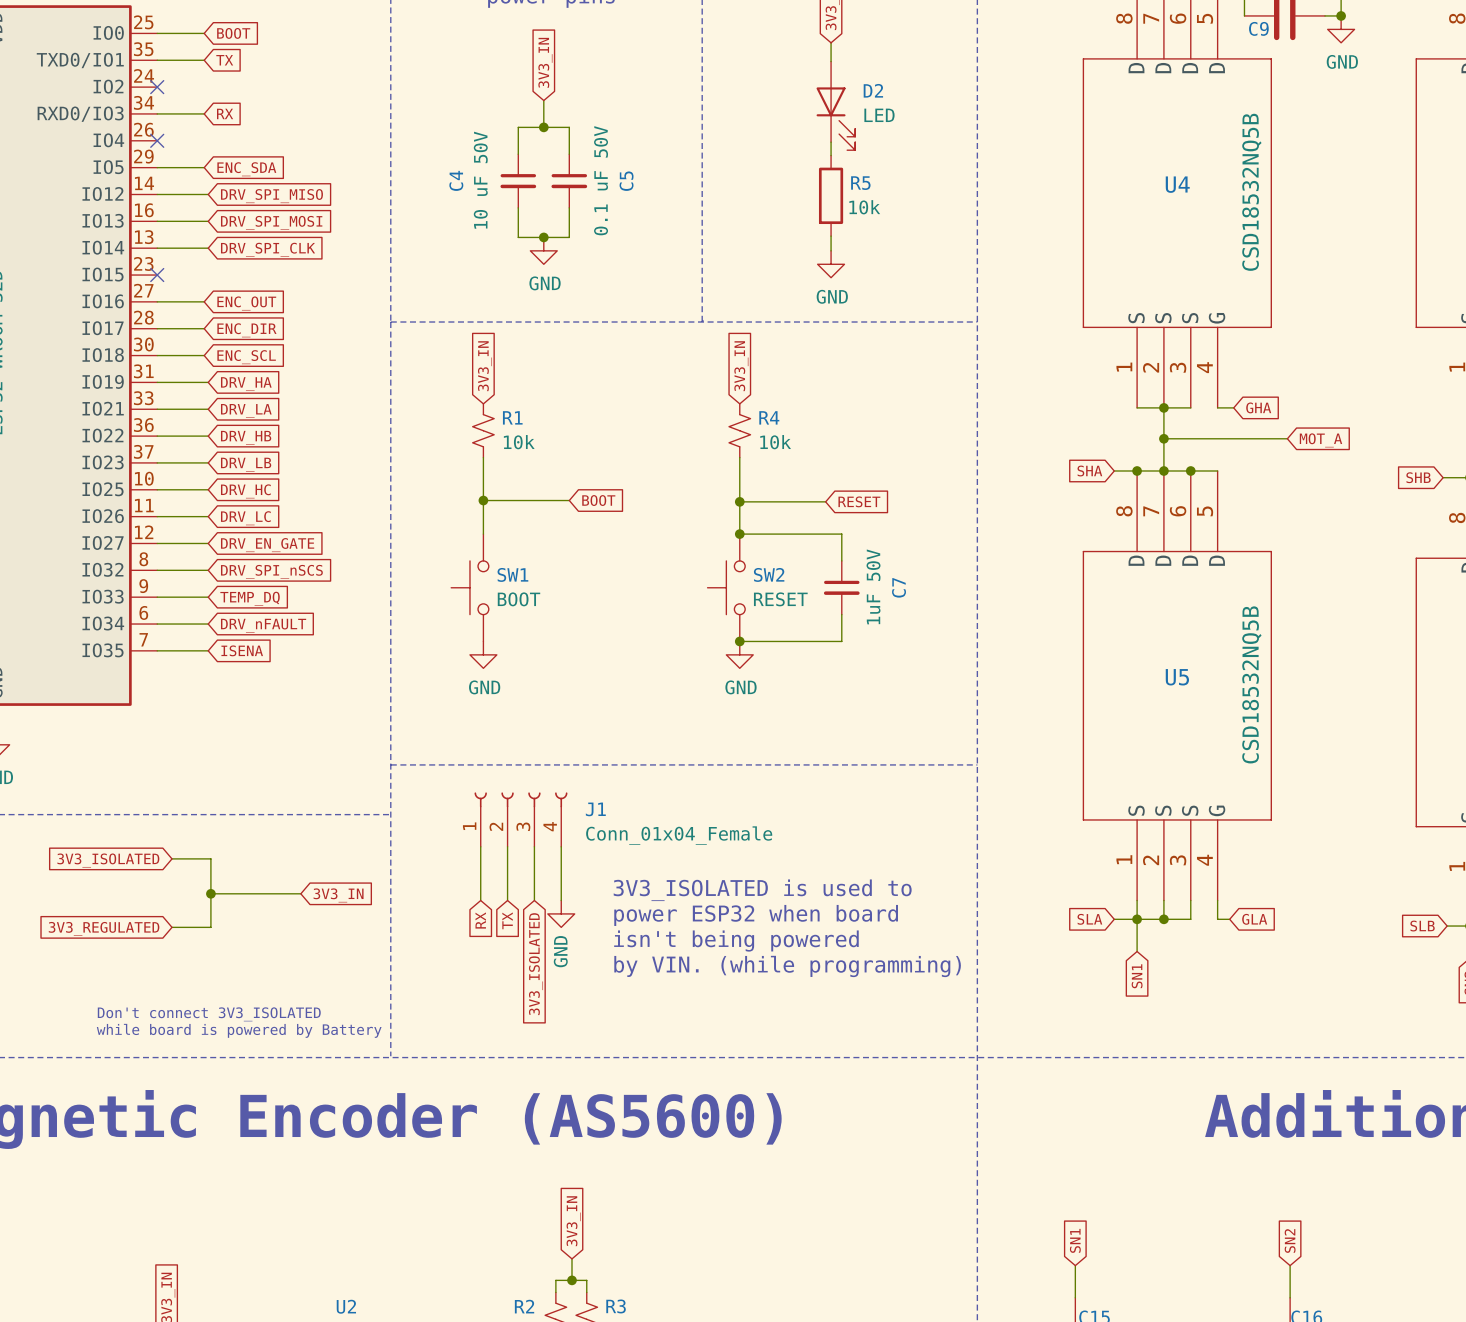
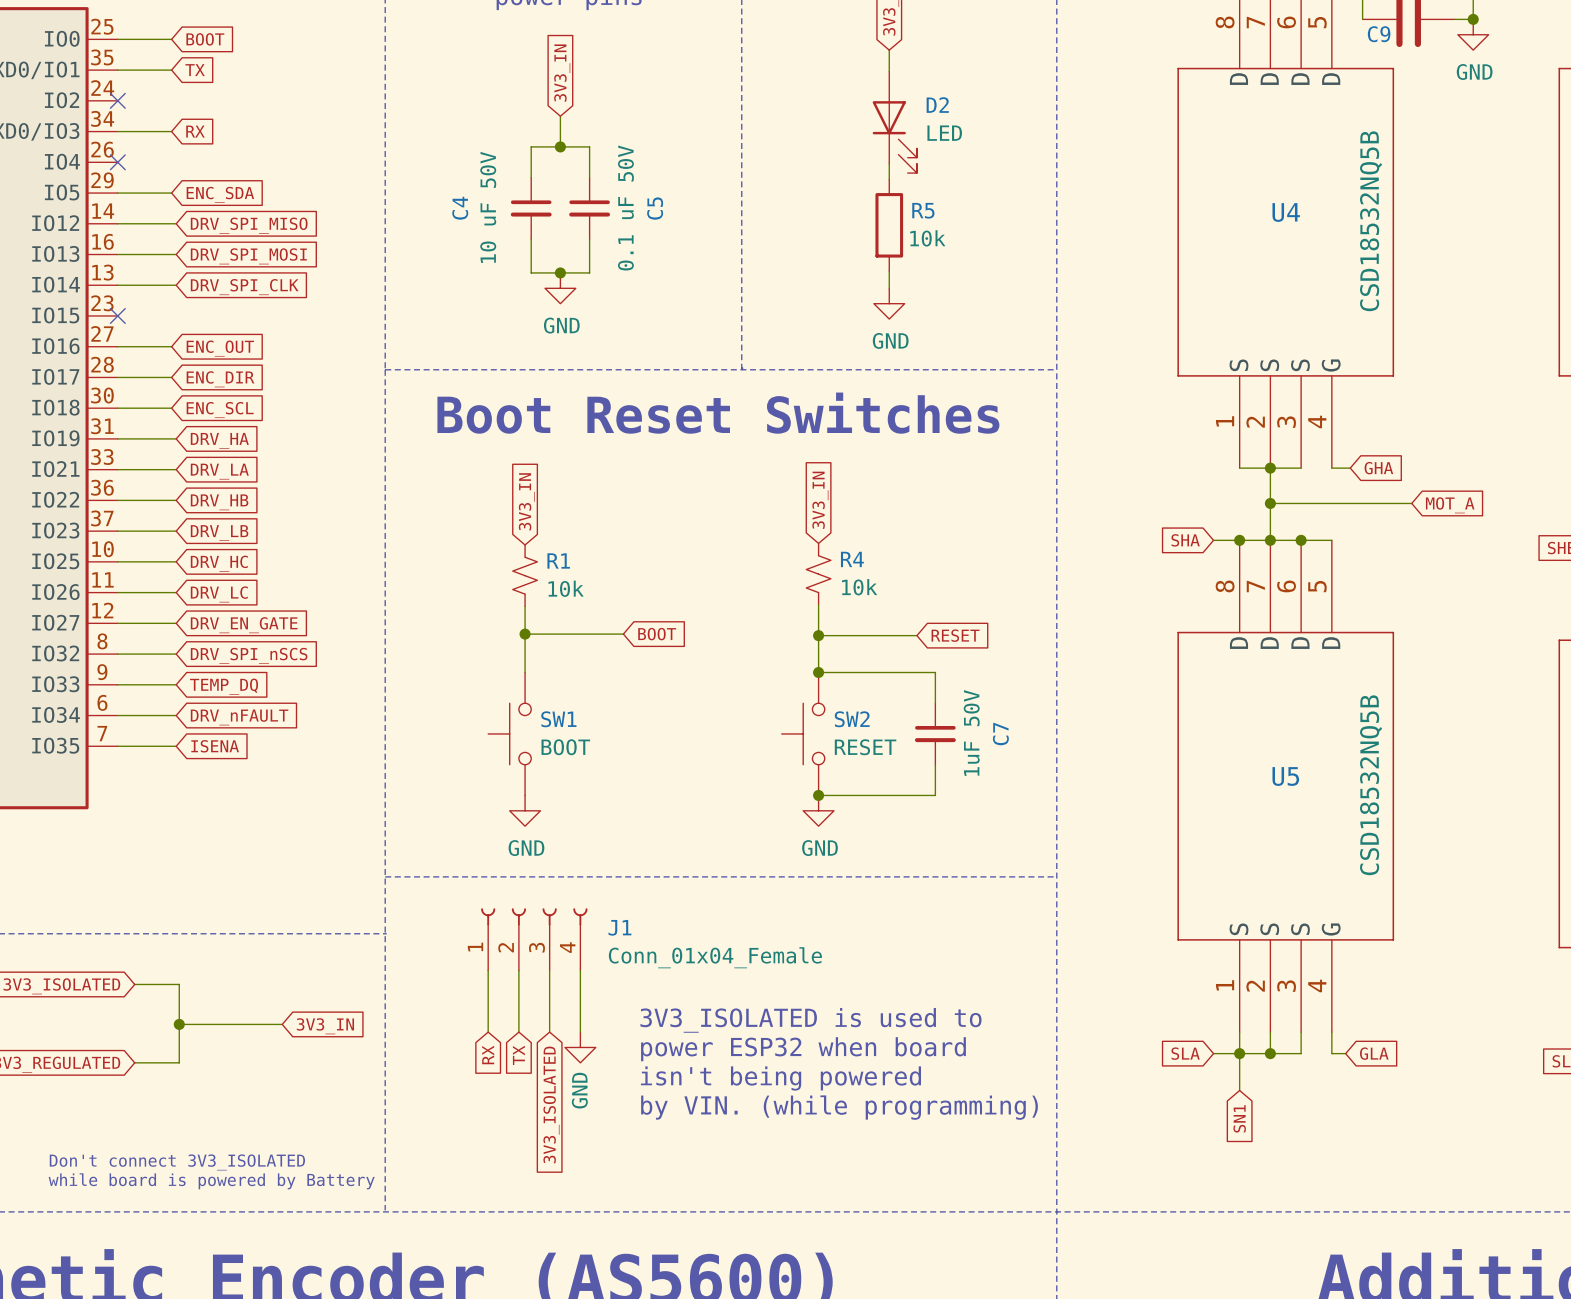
text: none -> Boot Reset Switches (718, 413)
global label position: 3V3_IN (485, 366) -> 3V3_IN (526, 501)
global label position: 3V3_IN (741, 366) -> 3V3_IN (820, 500)
R1 position: (483, 430) -> (525, 575)
R4 position: (739, 430) -> (818, 574)
wire: (483, 457) (483, 534) -> none
wire: (739, 457) (739, 534) (841, 534) (841, 560) -> none
wire: (483, 500) (569, 500) -> (525, 634) (623, 634)
junction position: (483, 500) -> (525, 634)
global label position: BOOT (598, 500) -> BOOT (657, 634)
wire: (739, 501) (825, 501) -> (818, 635) (916, 635)
junction: (739, 501) -> none
global label position: RESET (859, 501) -> RESET (955, 635)
wire: none -> (818, 604) (818, 672) (935, 672) (935, 703)
wire: none -> (525, 606) (525, 672)
junction: (739, 534) -> none
junction: none -> (818, 635)
junction: none -> (818, 672)
SW1 position: (469, 587) -> (509, 733)
SW2 position: (726, 587) -> (803, 733)
C7 position: (841, 587) -> (935, 733)
wire: (841, 614) (841, 641) (739, 641) -> (935, 764) (935, 795) (818, 795)
junction: (739, 641) -> none
power symbol position: GND (483, 654) -> GND (525, 810)
power symbol position: GND (739, 654) -> GND (818, 810)
junction: none -> (818, 795)

